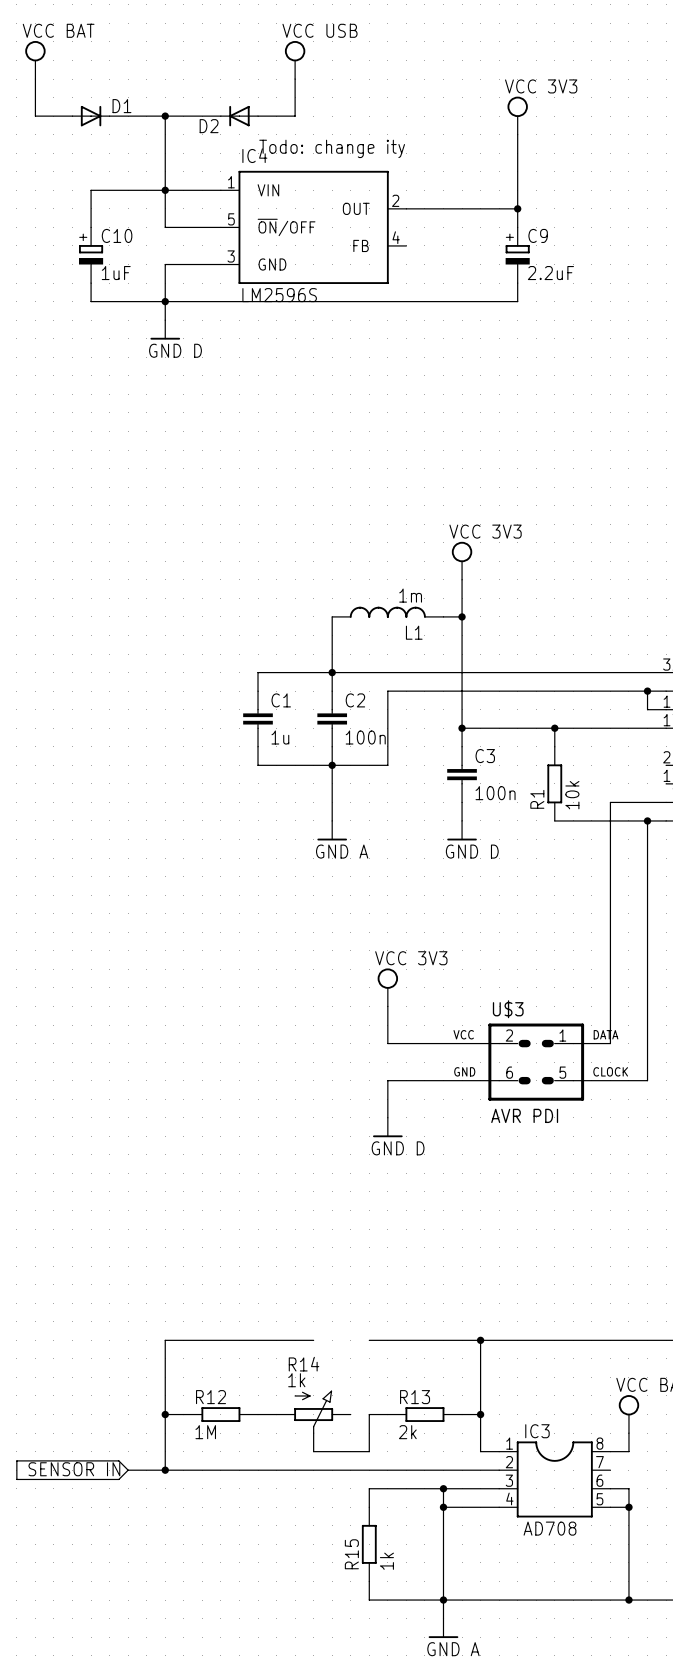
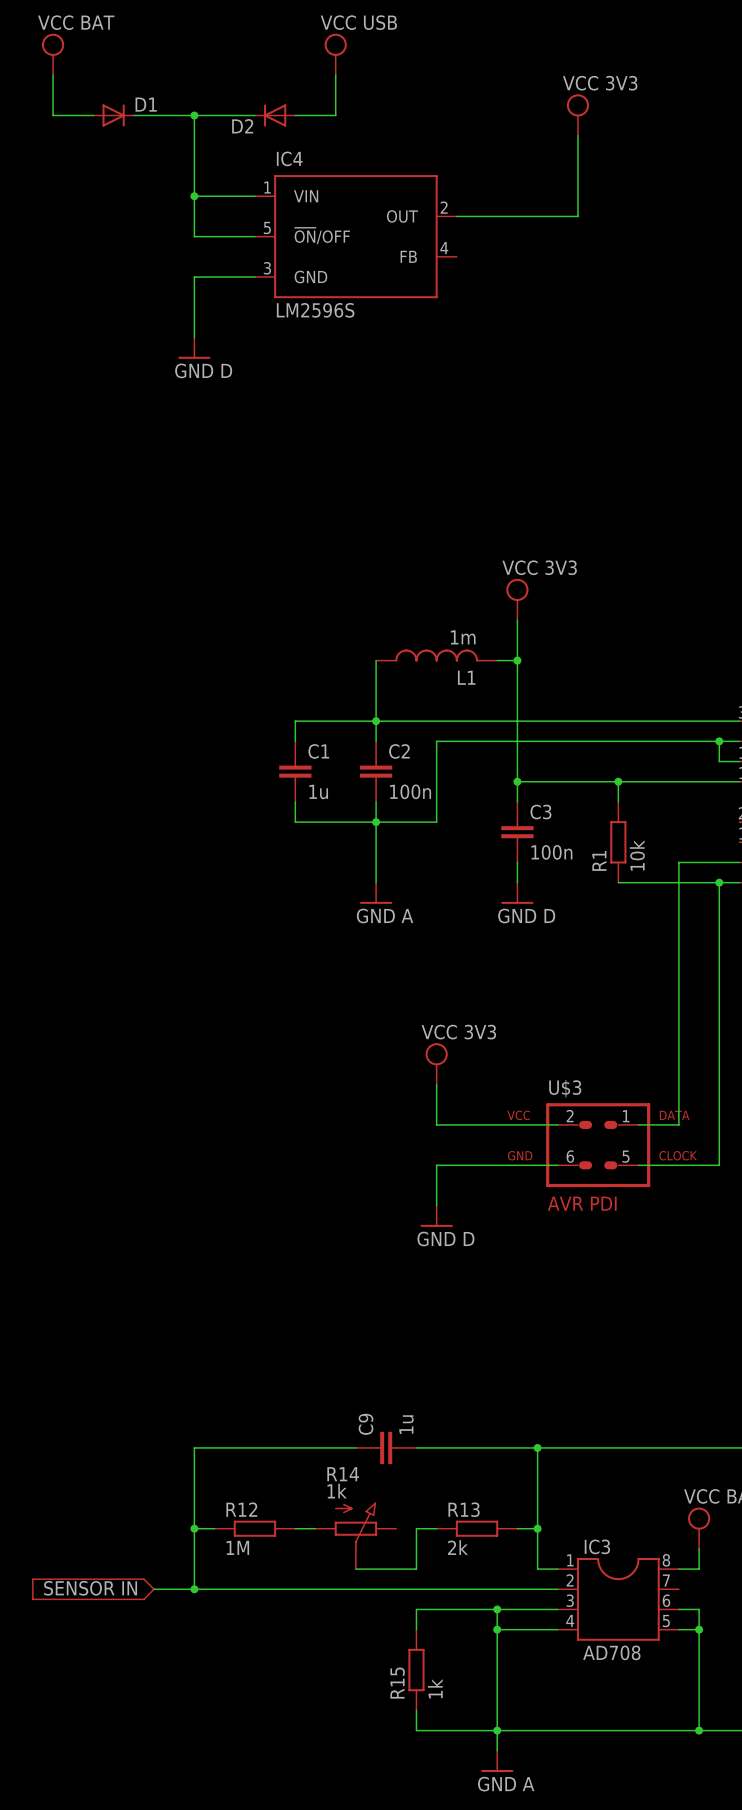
text: Todo: change ity (332, 148) -> none
wire: (165, 190) (91, 190) (91, 227) -> none
wire: (517, 208) (517, 227) -> none
junction: (517, 208) -> none
C9 symbol: [505, 227, 530, 284] -> [355, 1431, 417, 1465]
C9 name position: C9 (538, 235) -> C9 (366, 1424)
C10: 1uF (91, 255) -> none
C9 value: 2.2uF (550, 273) -> 1u (406, 1424)
wire: (91, 283) (91, 301) (517, 301) (517, 283) -> none
junction: (165, 301) -> none

